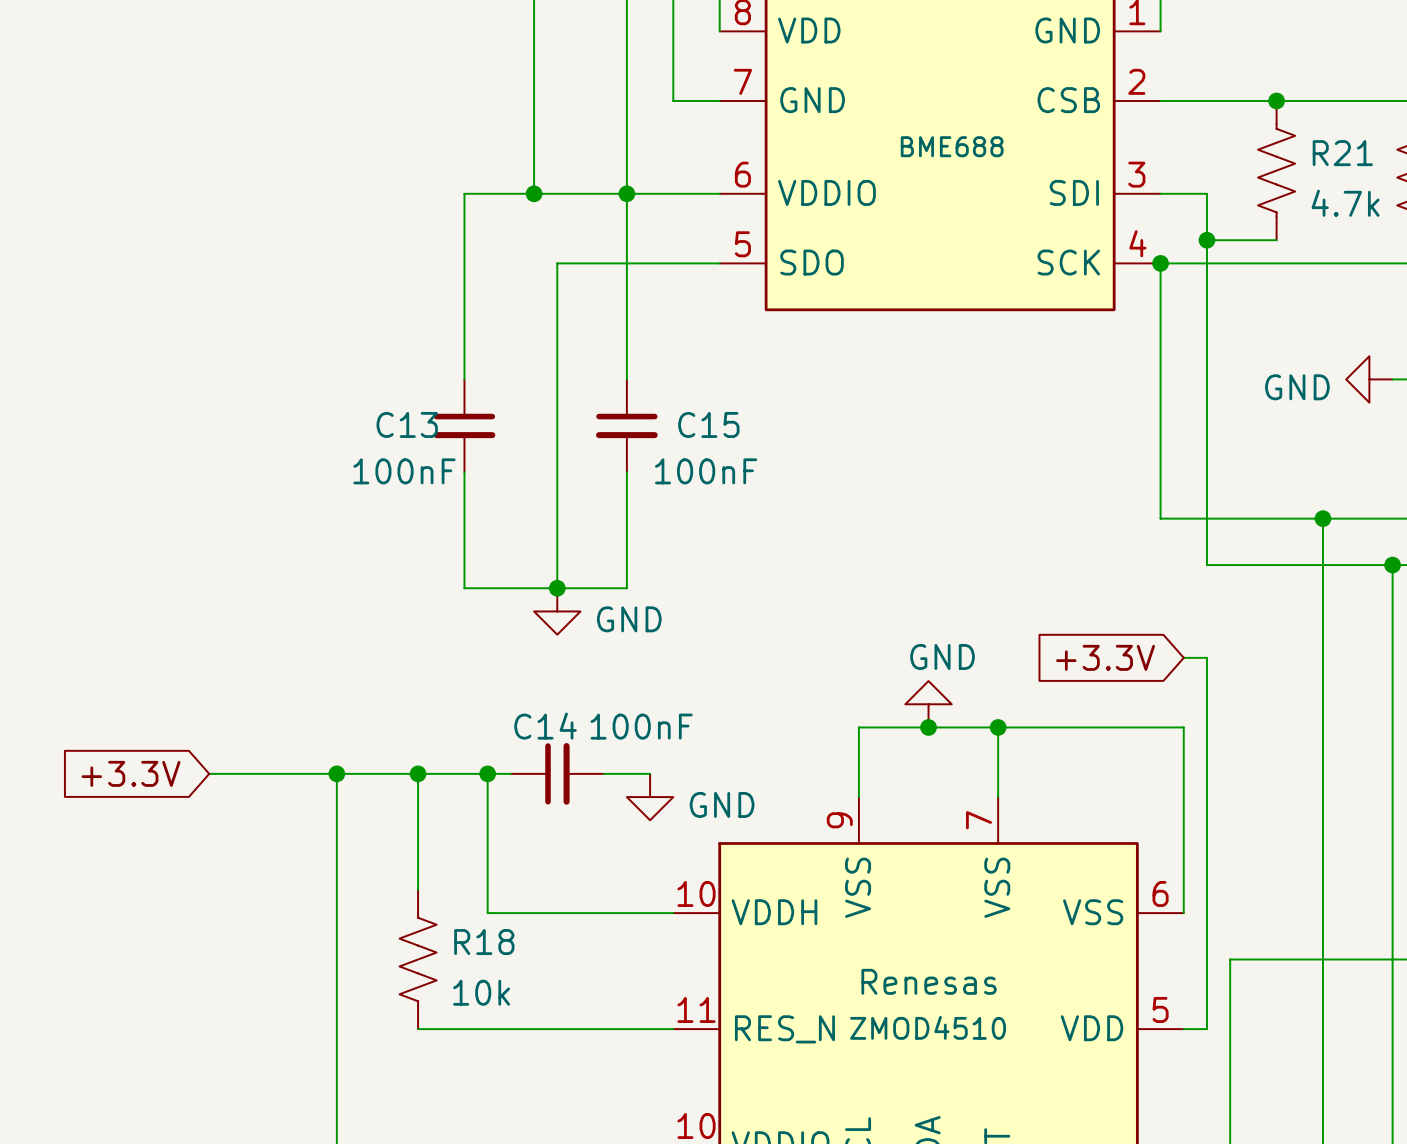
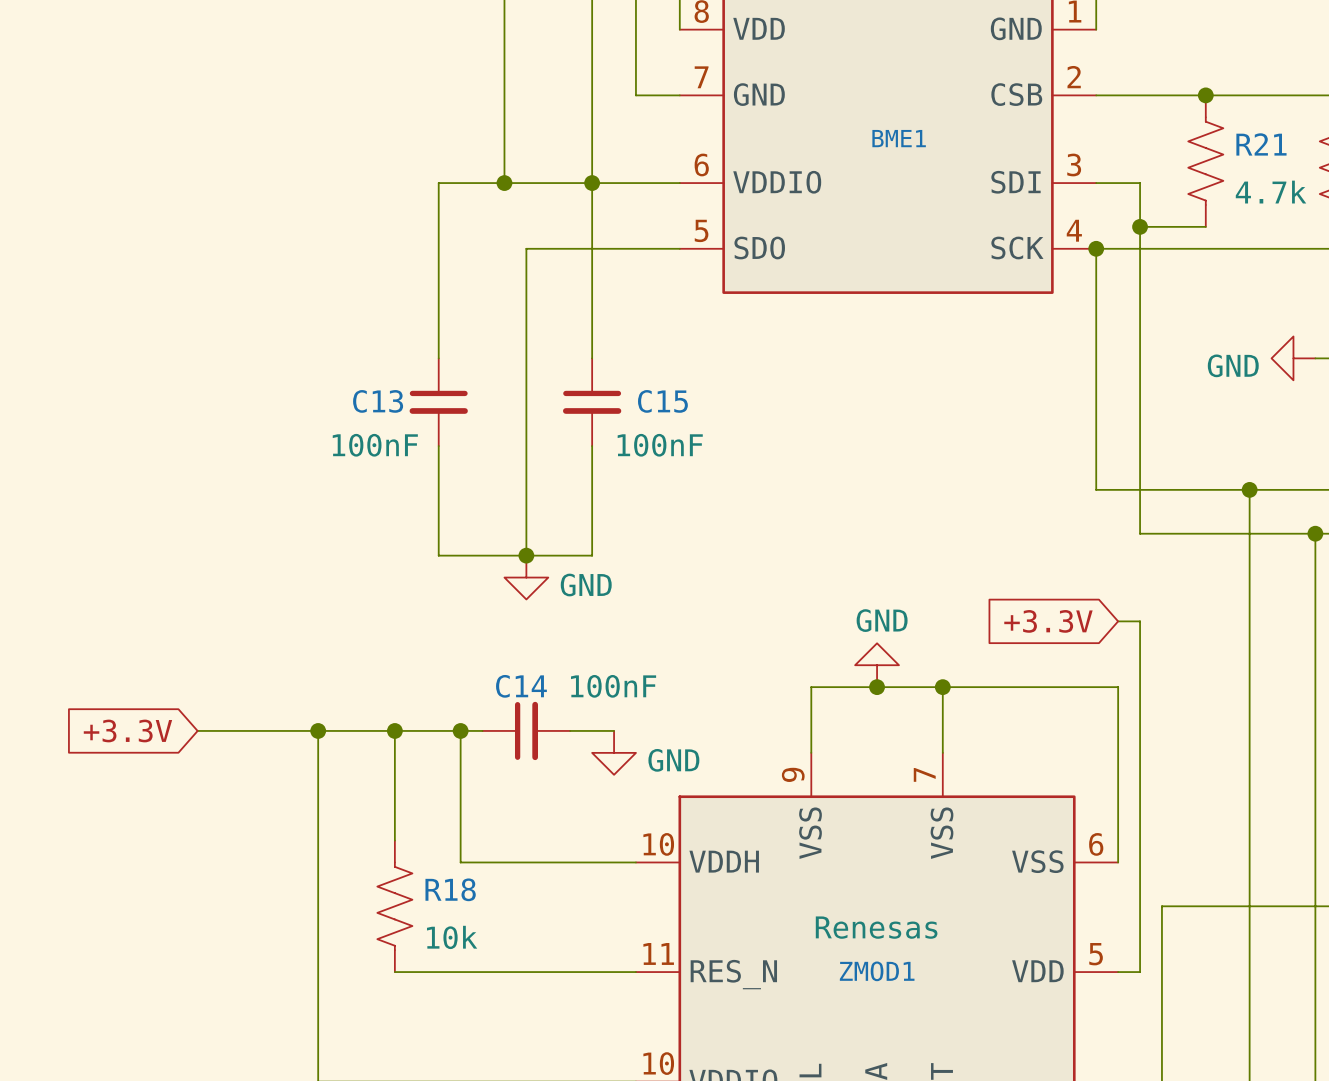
BME688 name: BME688 (952, 146) -> BME1 (899, 138)
ZMOD4510 name: ZMOD4510 (928, 1027) -> ZMOD1 (877, 971)

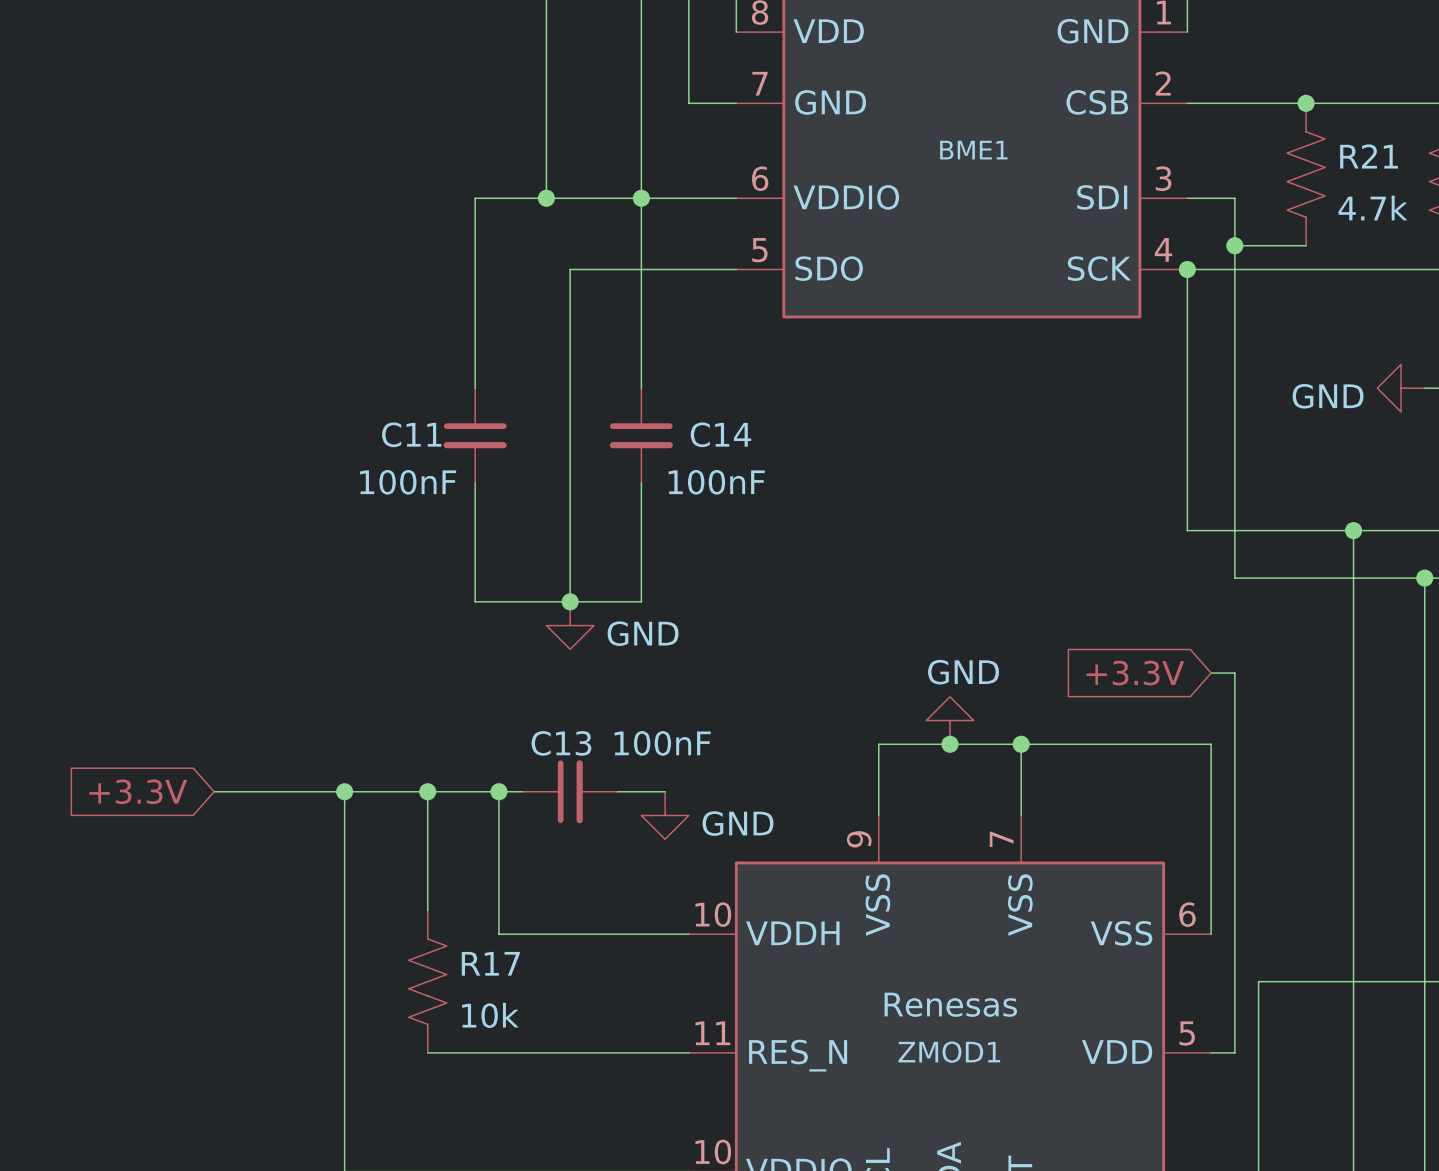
C13 name: C13 (378, 401) -> C11 (411, 434)
C15 name: C15 (662, 401) -> C14 (720, 434)
C14 name: C14 (521, 686) -> C13 (561, 743)
R18 name: R18 (450, 889) -> R17 (490, 963)

